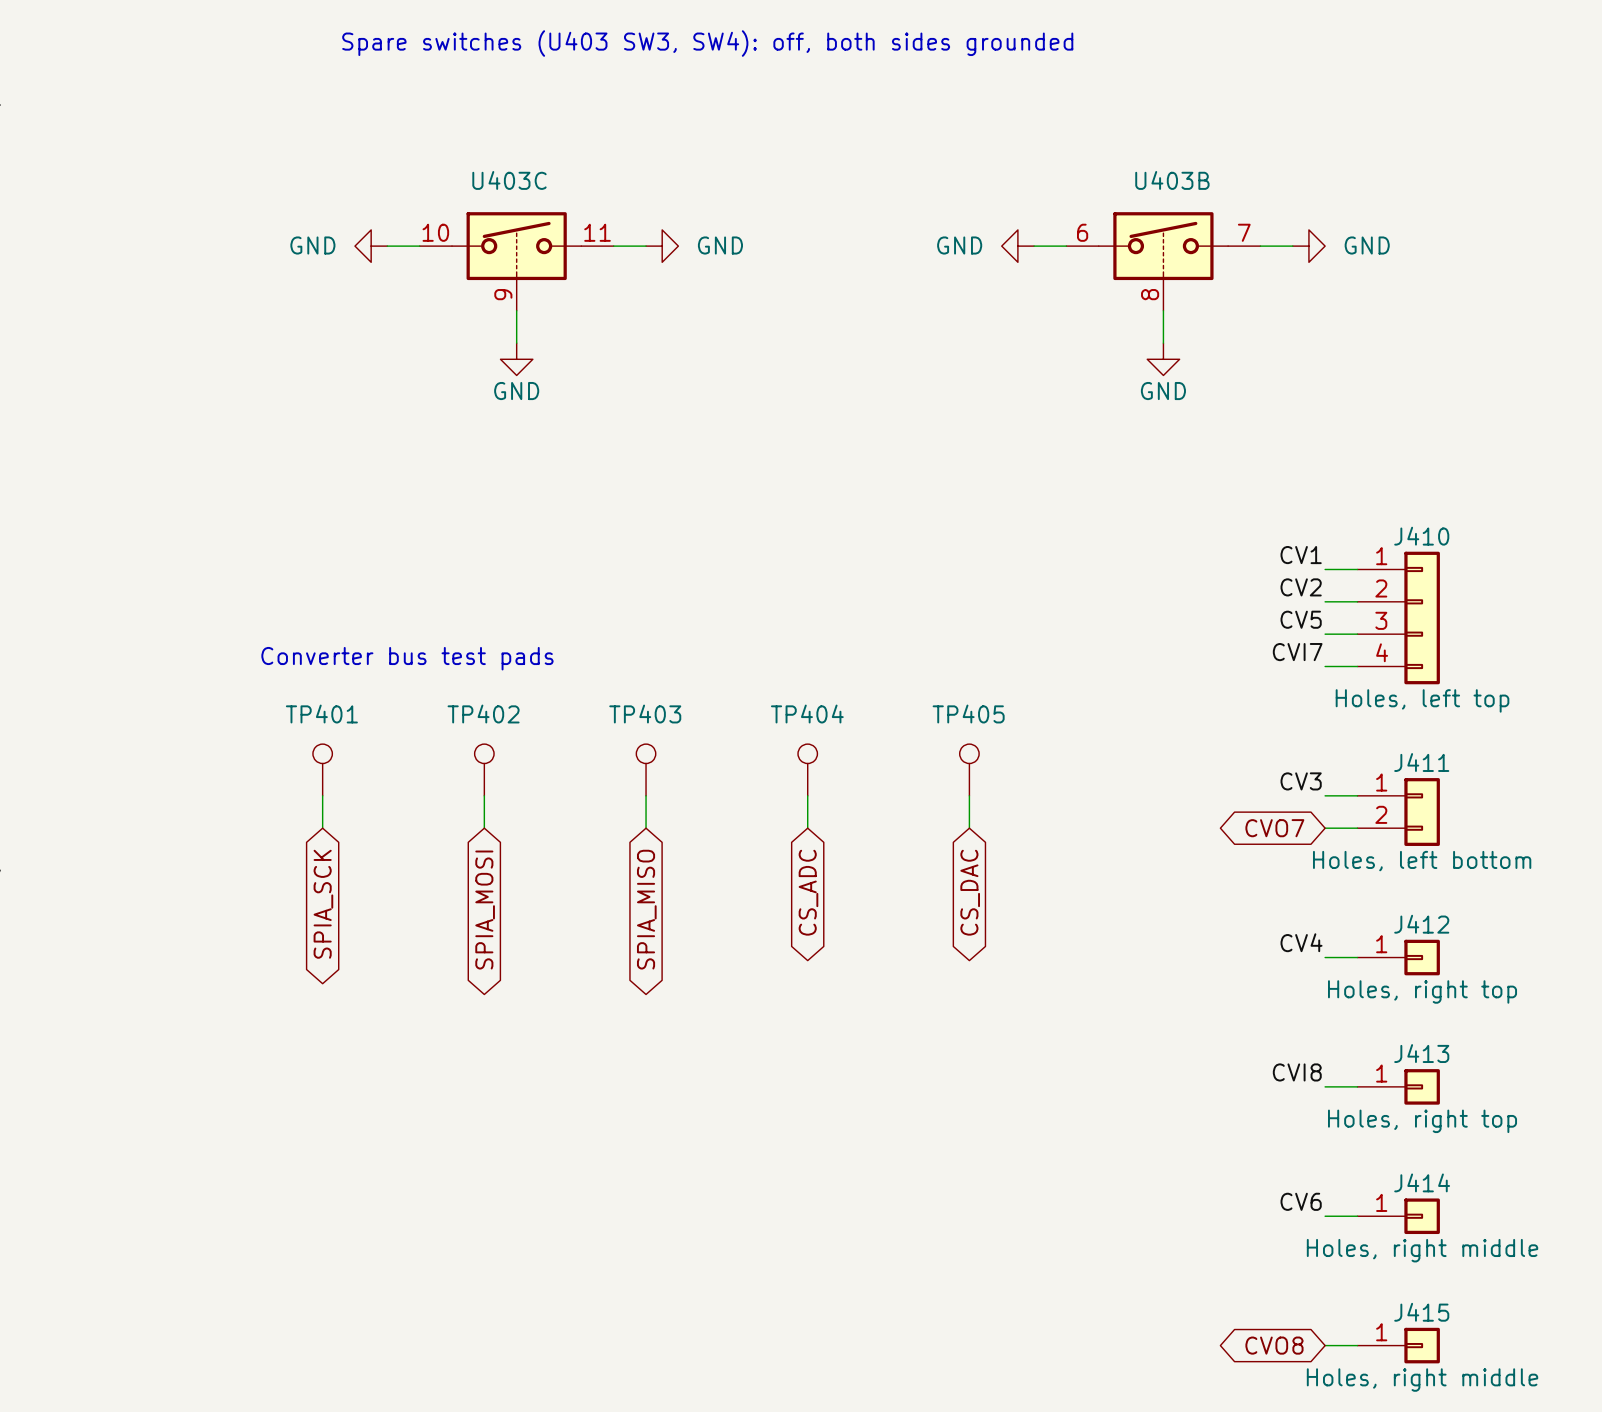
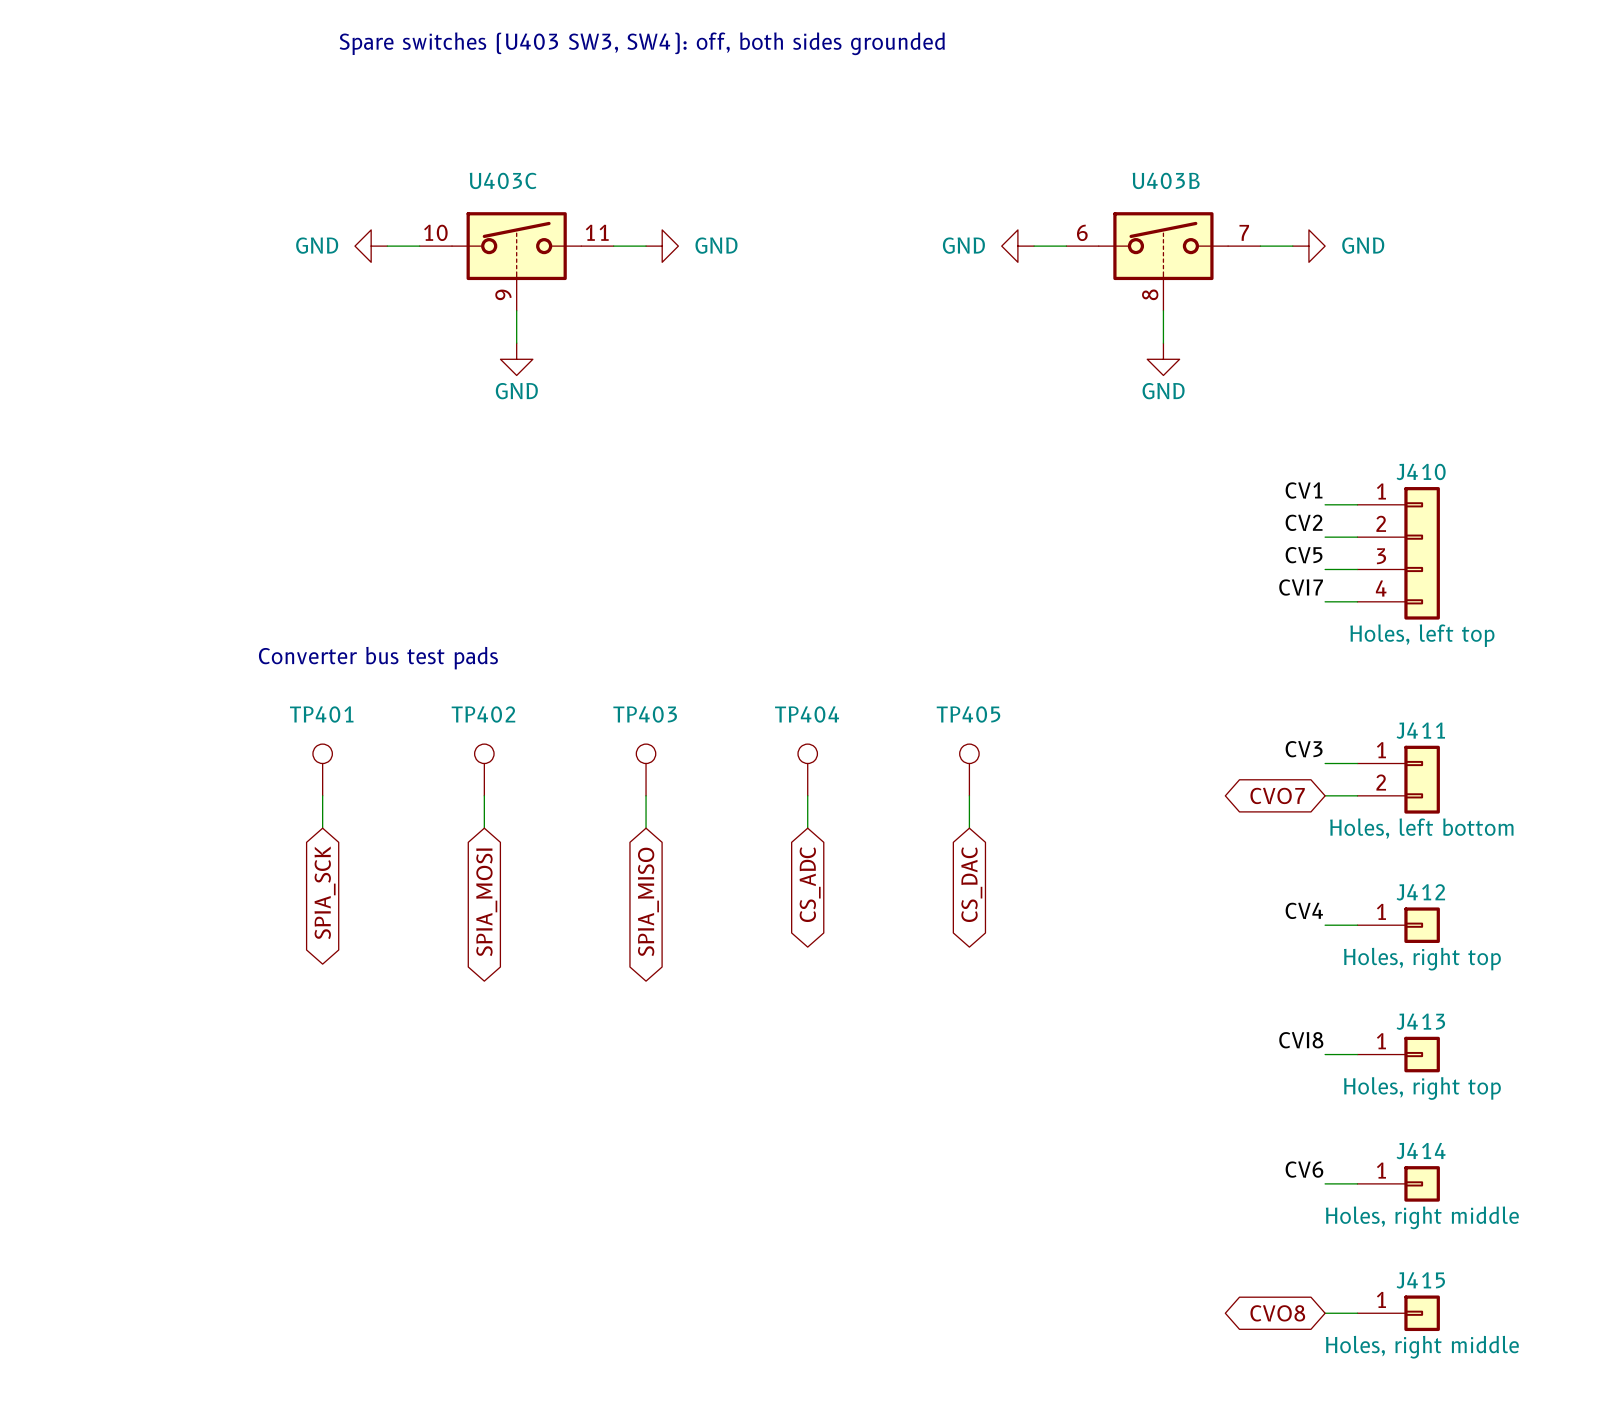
label: none -> CV1 (1304, 490)
label: none -> CV2 (1304, 522)
wire: none -> (1325, 537) (1357, 537)
label: CV1 (1301, 555) -> CV5 (1304, 555)
label: CV2 (1301, 587) -> CVI7 (1301, 587)
J410 position: (1398, 617) -> (1398, 553)
label: CV5 (1301, 619) -> none
wire: (1325, 634) (1357, 634) -> (1325, 504) (1357, 504)
label: CVI7 (1297, 652) -> none
wire: (1325, 666) (1357, 666) -> (1325, 763) (1357, 763)
label position: CV3 (1301, 781) -> CV3 (1304, 749)
J411 position: (1398, 812) -> (1398, 779)
global label position: CVO7 (1274, 828) -> CVO7 (1277, 795)
wire: (1325, 828) (1357, 828) -> (1325, 925) (1357, 925)
label position: CV4 (1301, 942) -> CV4 (1304, 910)
wire: (1325, 957) (1357, 957) -> (1325, 1054) (1357, 1054)
J412 position: (1398, 957) -> (1398, 925)
label position: CVI8 (1297, 1072) -> CVI8 (1301, 1040)
wire: (1325, 1086) (1357, 1086) -> (1325, 1183) (1357, 1183)
J413 position: (1398, 1086) -> (1398, 1054)
label position: CV6 (1301, 1201) -> CV6 (1304, 1169)
wire: (1325, 1216) (1357, 1216) -> (1325, 1313) (1357, 1313)
J414 position: (1398, 1216) -> (1398, 1183)
global label position: CVO8 (1274, 1345) -> CVO8 (1277, 1313)
wire: (1325, 1345) (1357, 1345) -> none
J415 position: (1398, 1345) -> (1398, 1313)

